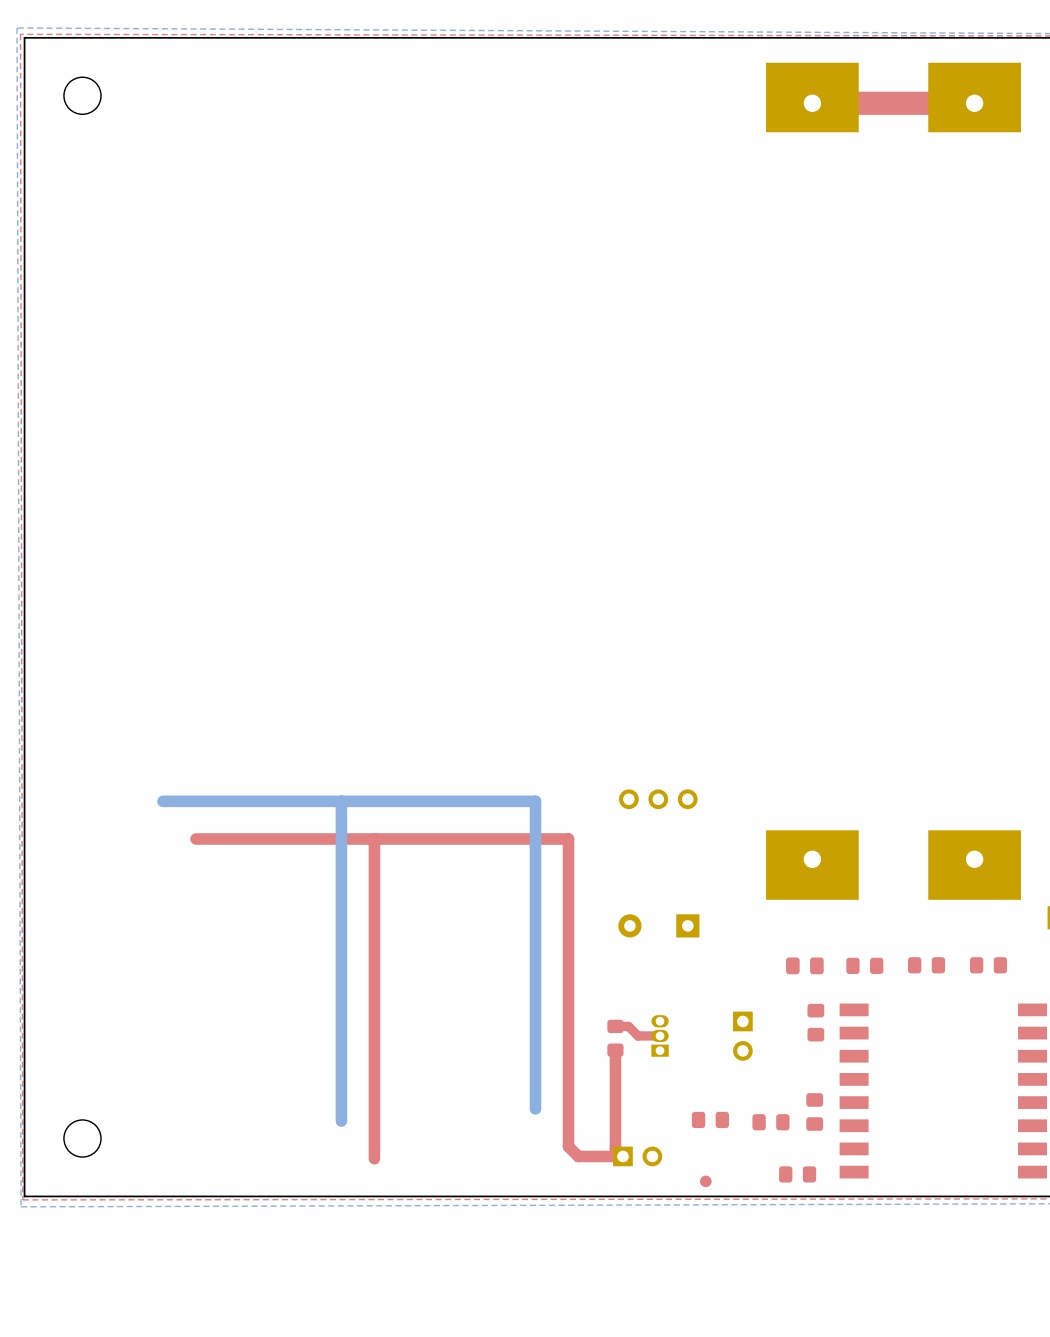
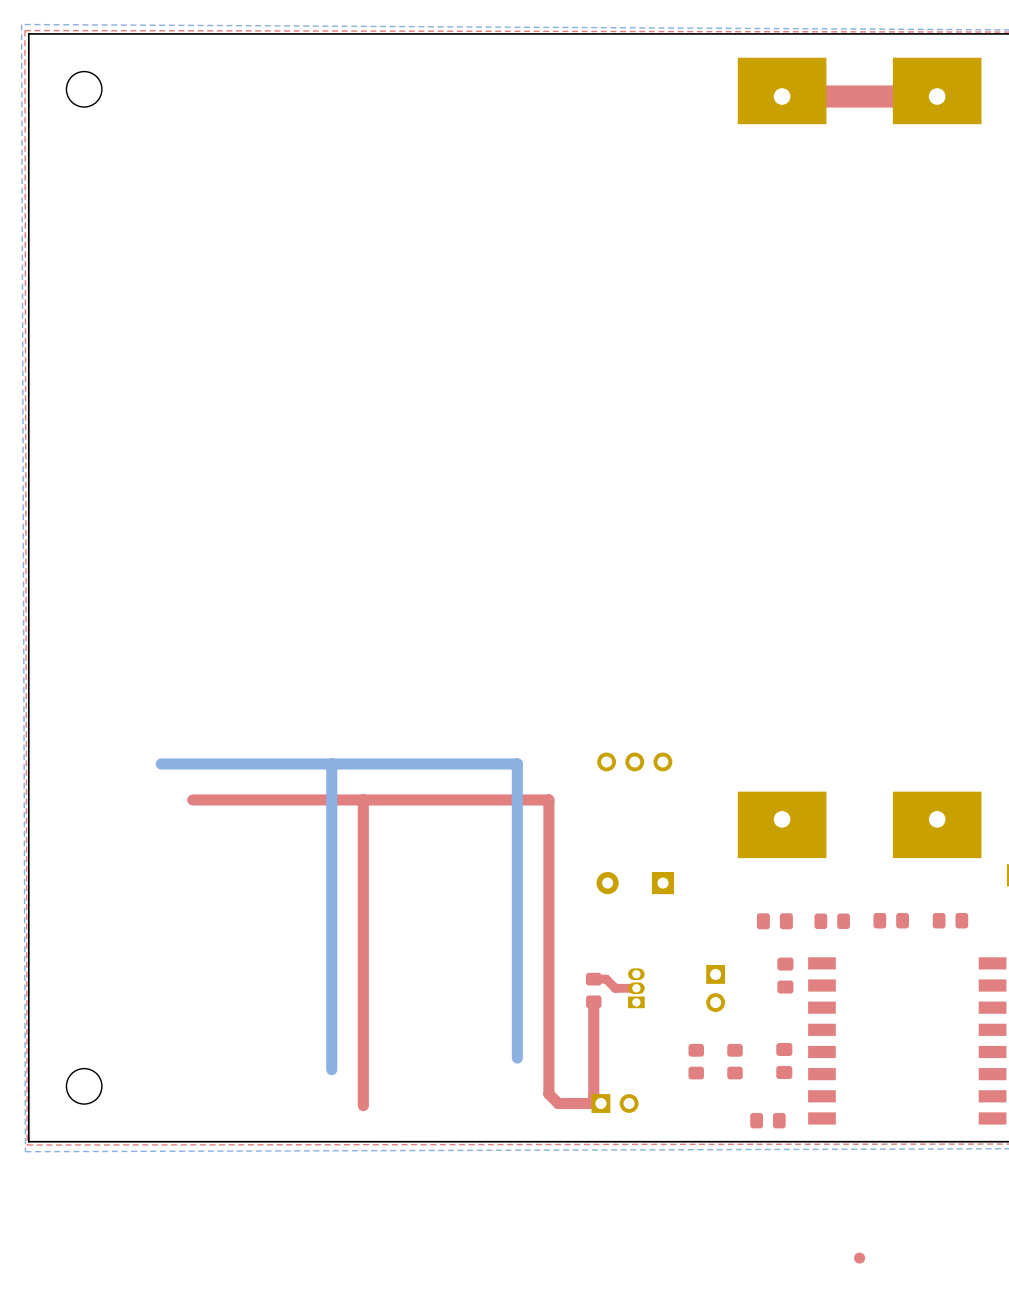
part rotation: 0° (710, 1119) -> 90° clockwise (696, 1061)
part rotation: 0° (770, 1122) -> 90° clockwise (735, 1061)
part position: (705, 1181) -> (859, 1258)

